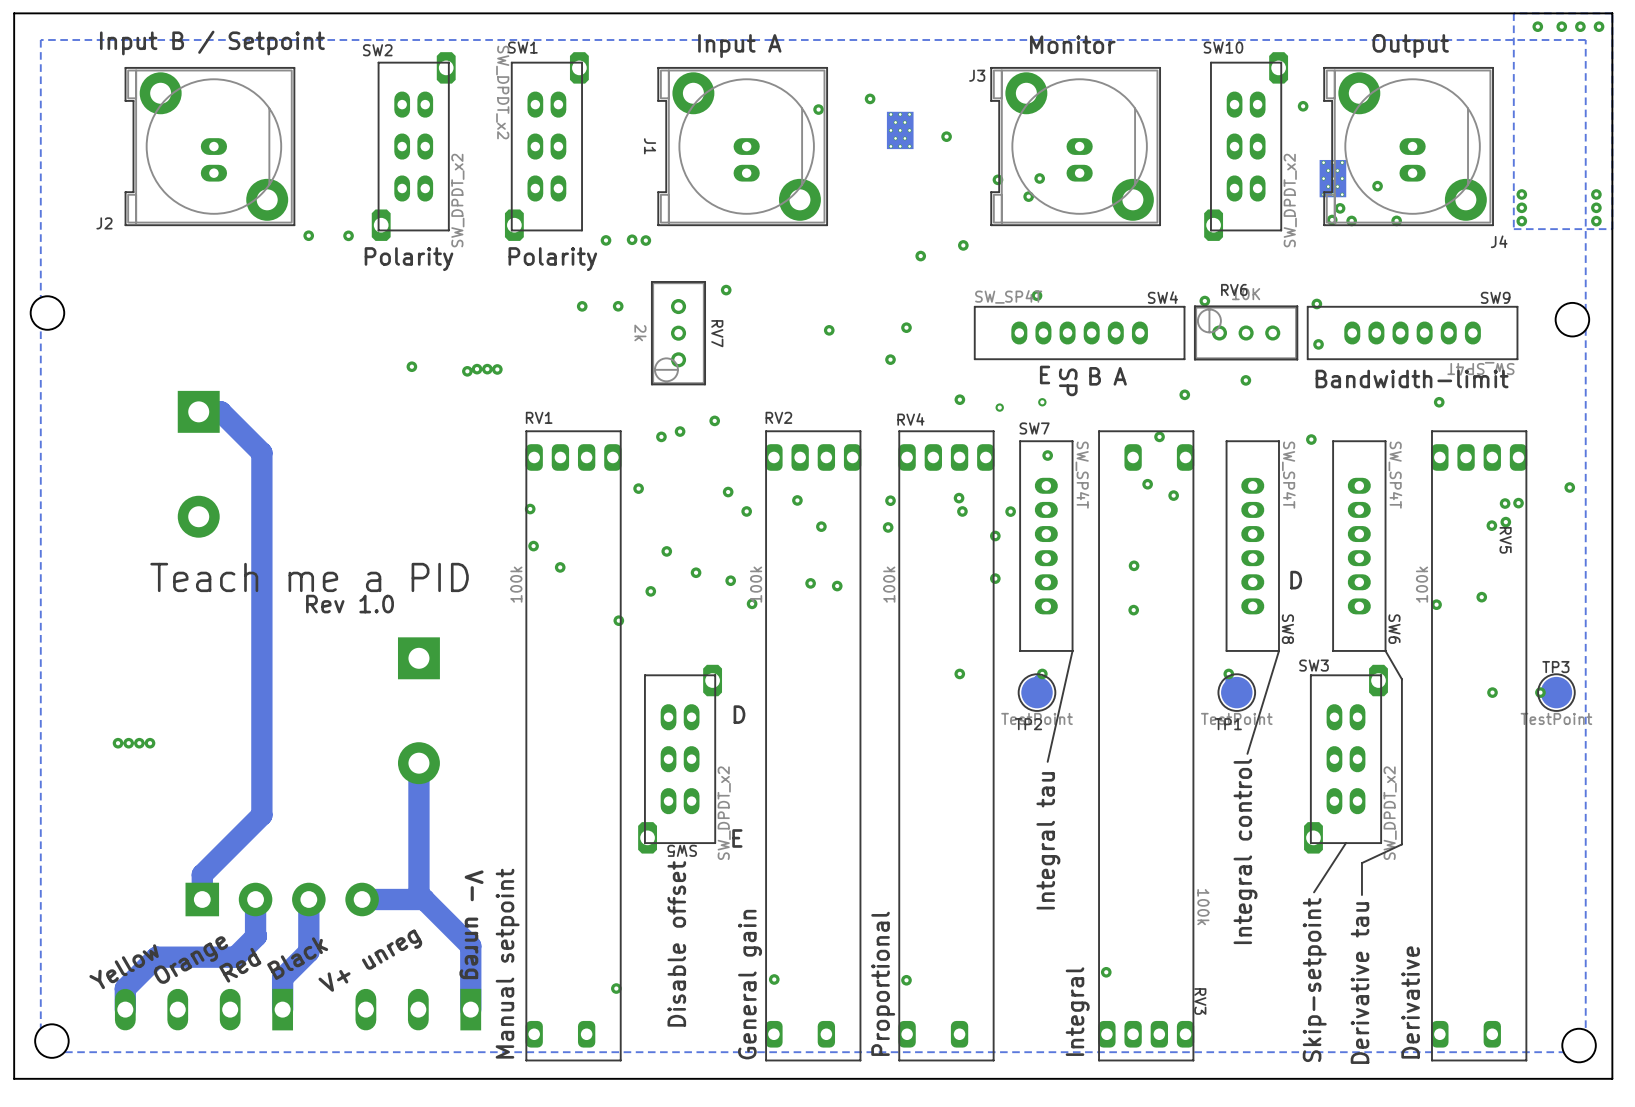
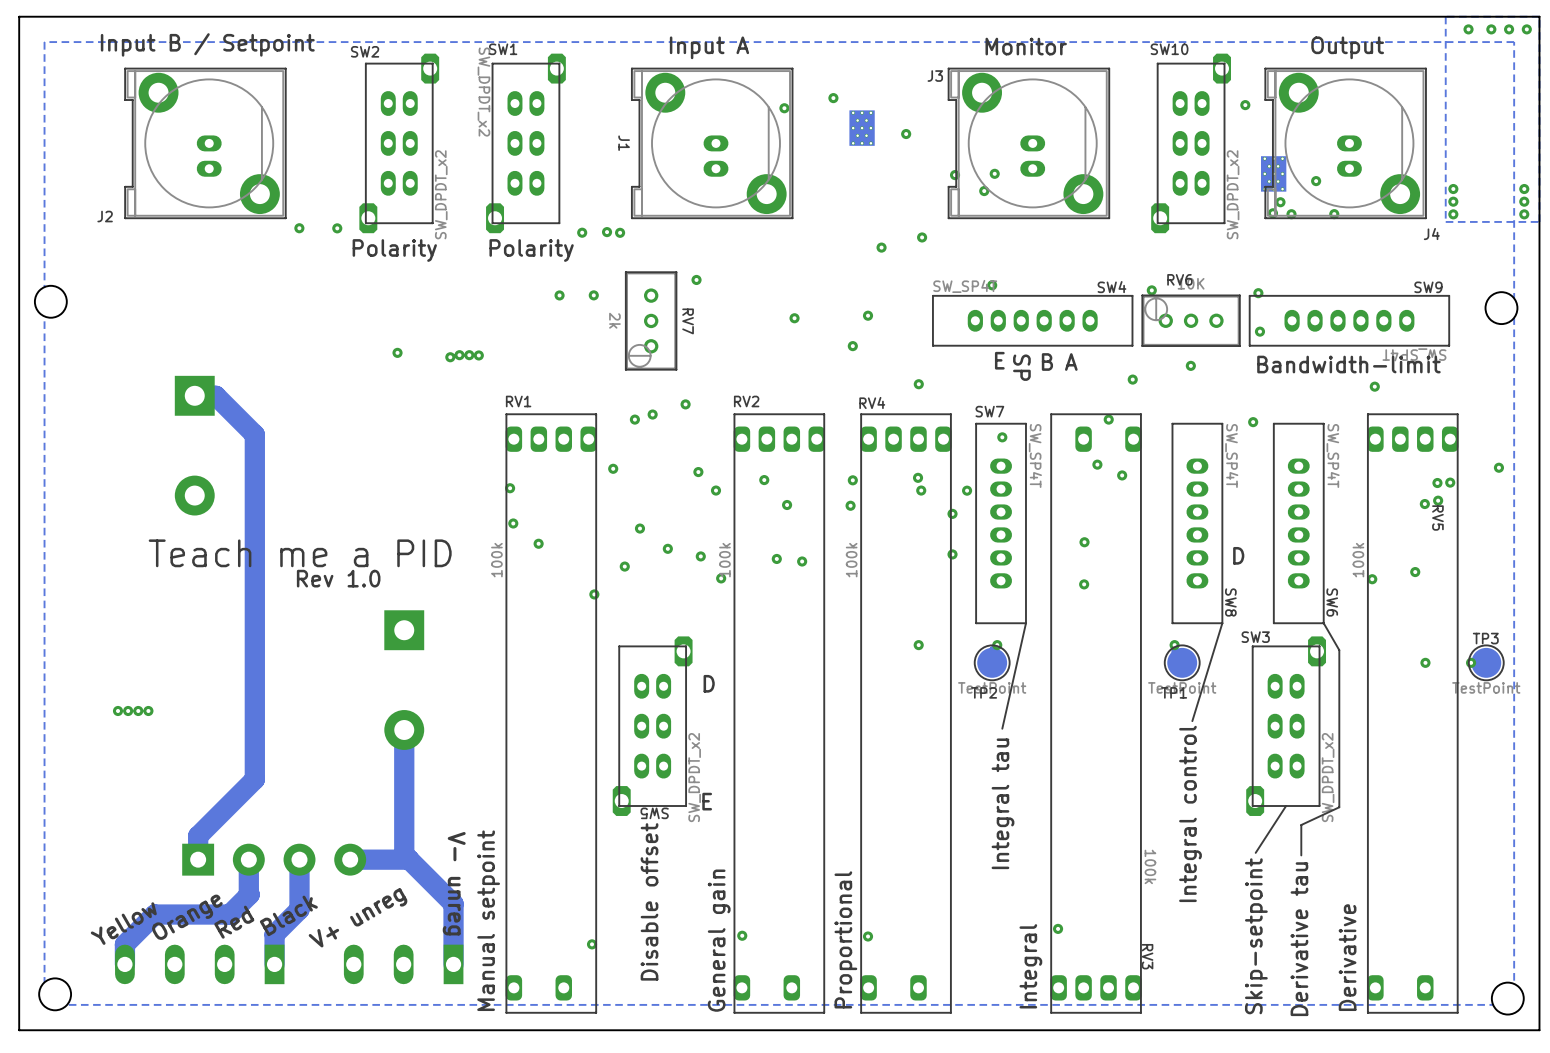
via: (1042, 402) -> none
via: (999, 407) -> none

